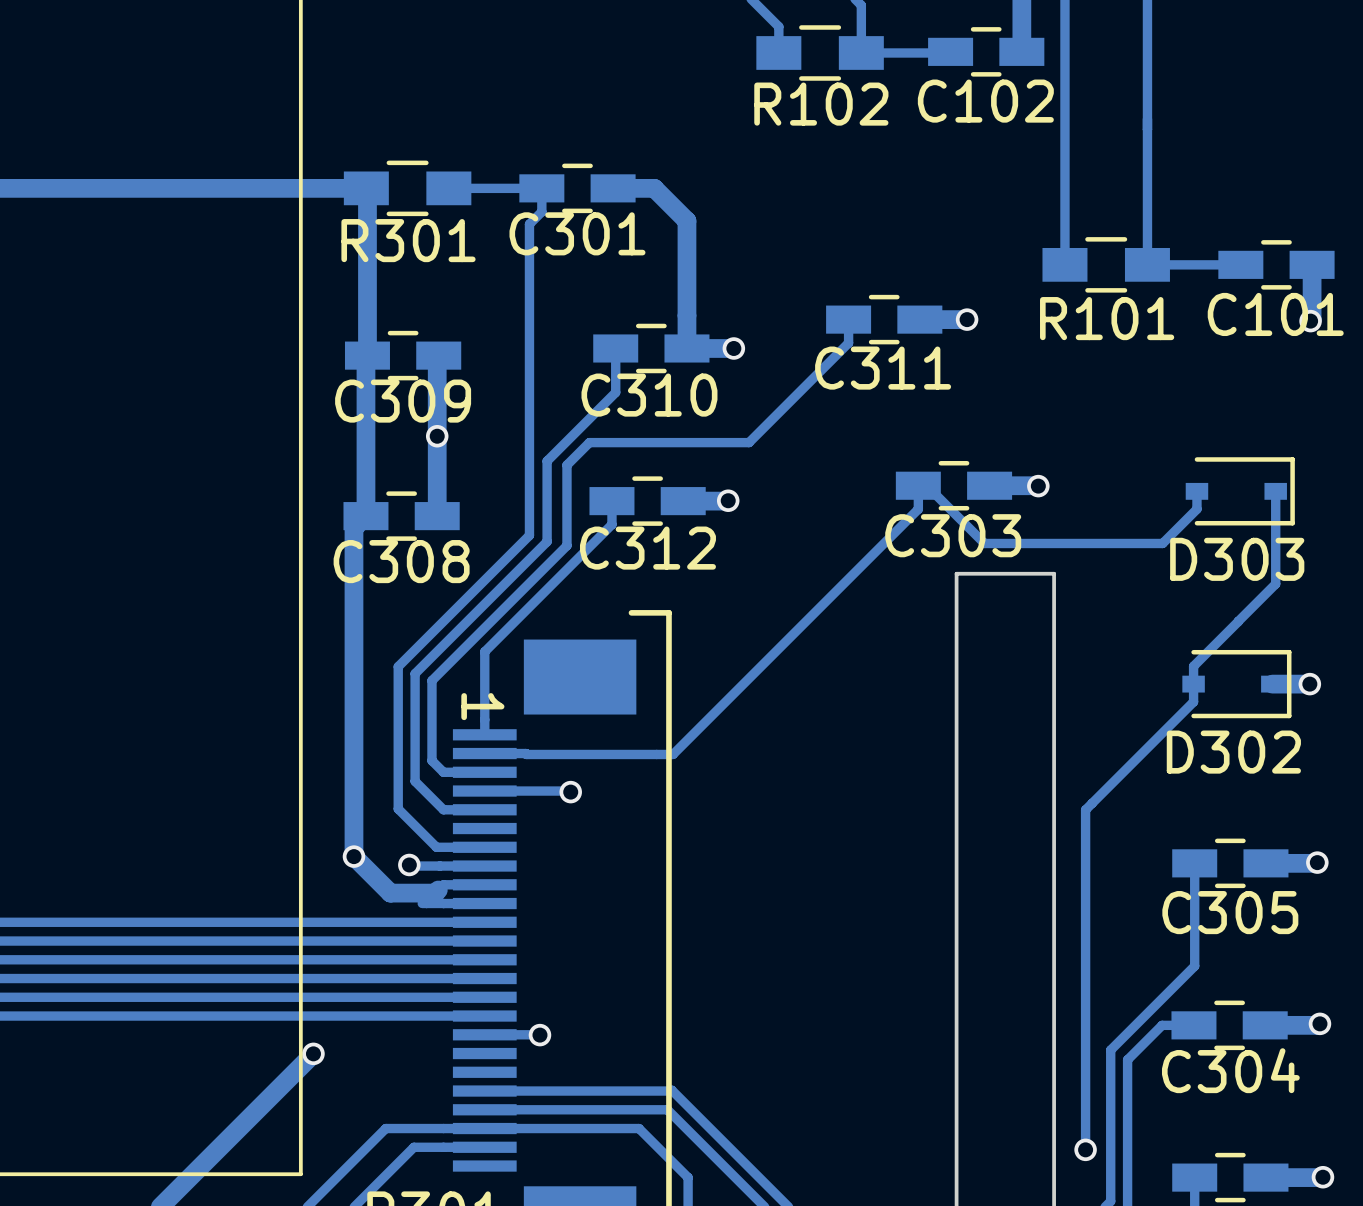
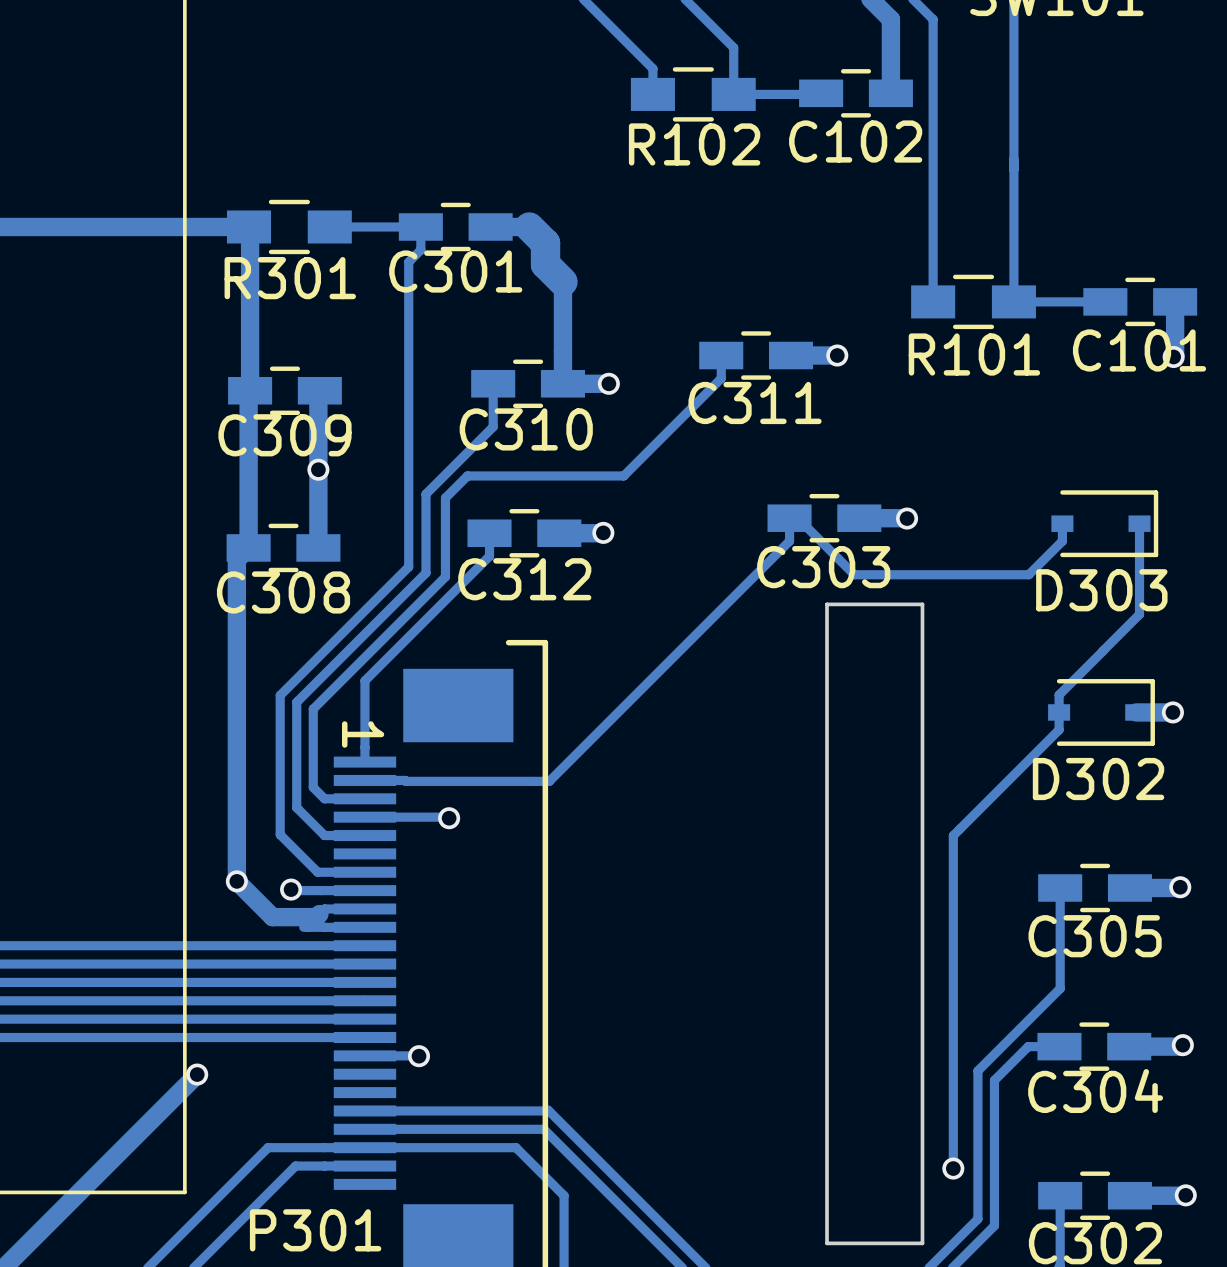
track: (652, 188) (686, 220) (686, 244) -> (529, 226) (545, 243) (545, 264) (562, 281)

